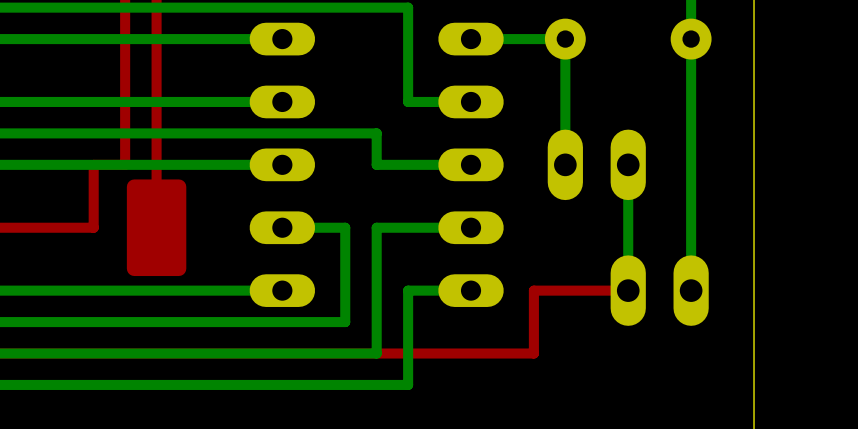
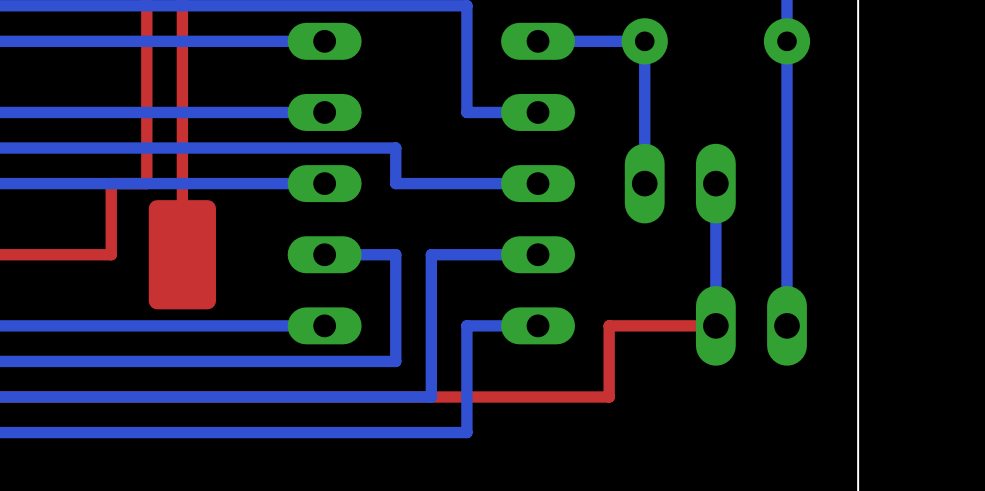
bottom track: (345, 133) (376, 133) (376, 164) -> (395, 148) (395, 183) (431, 183)

